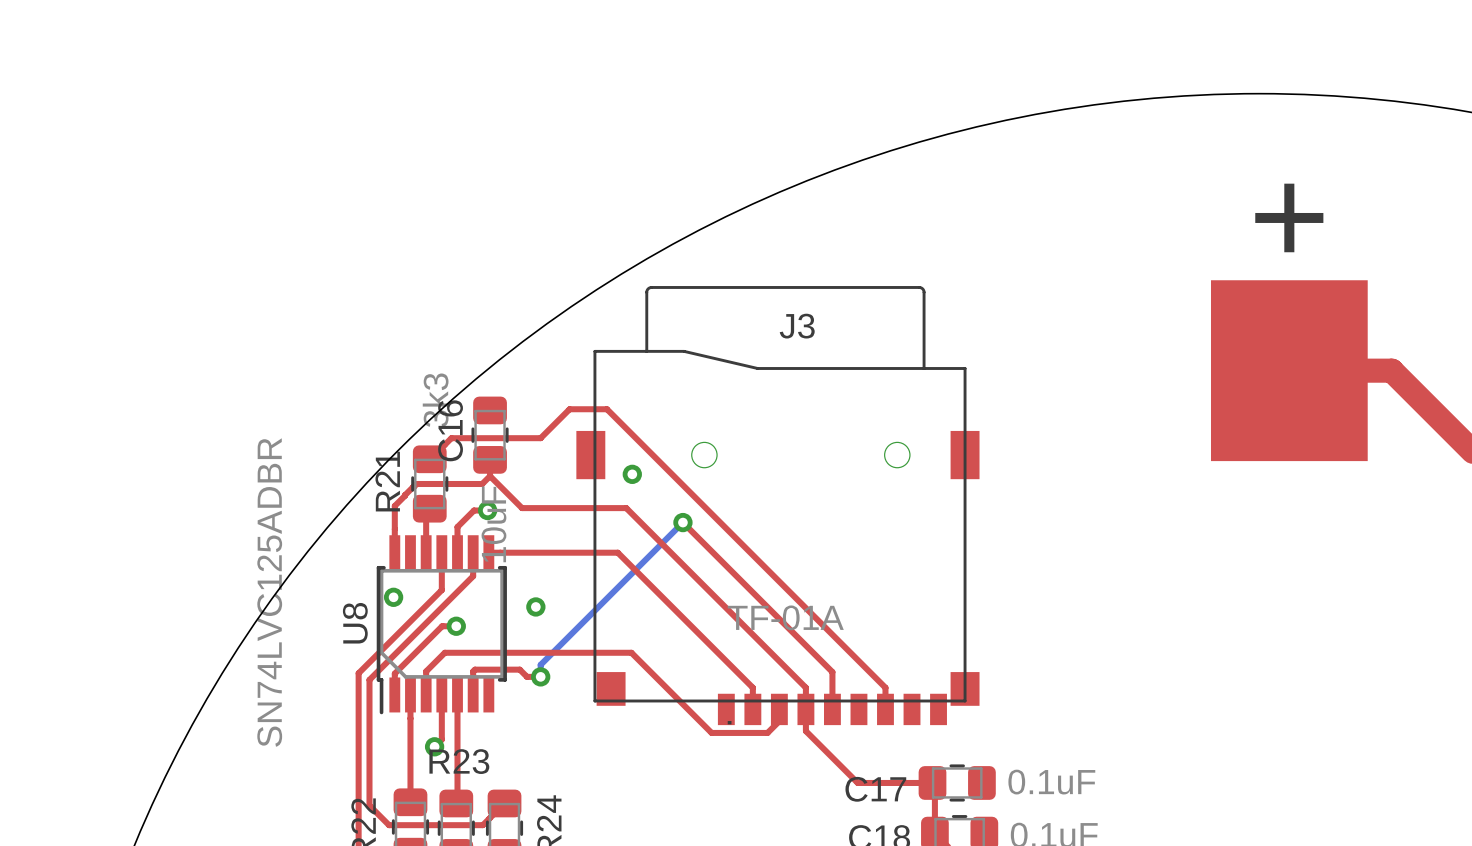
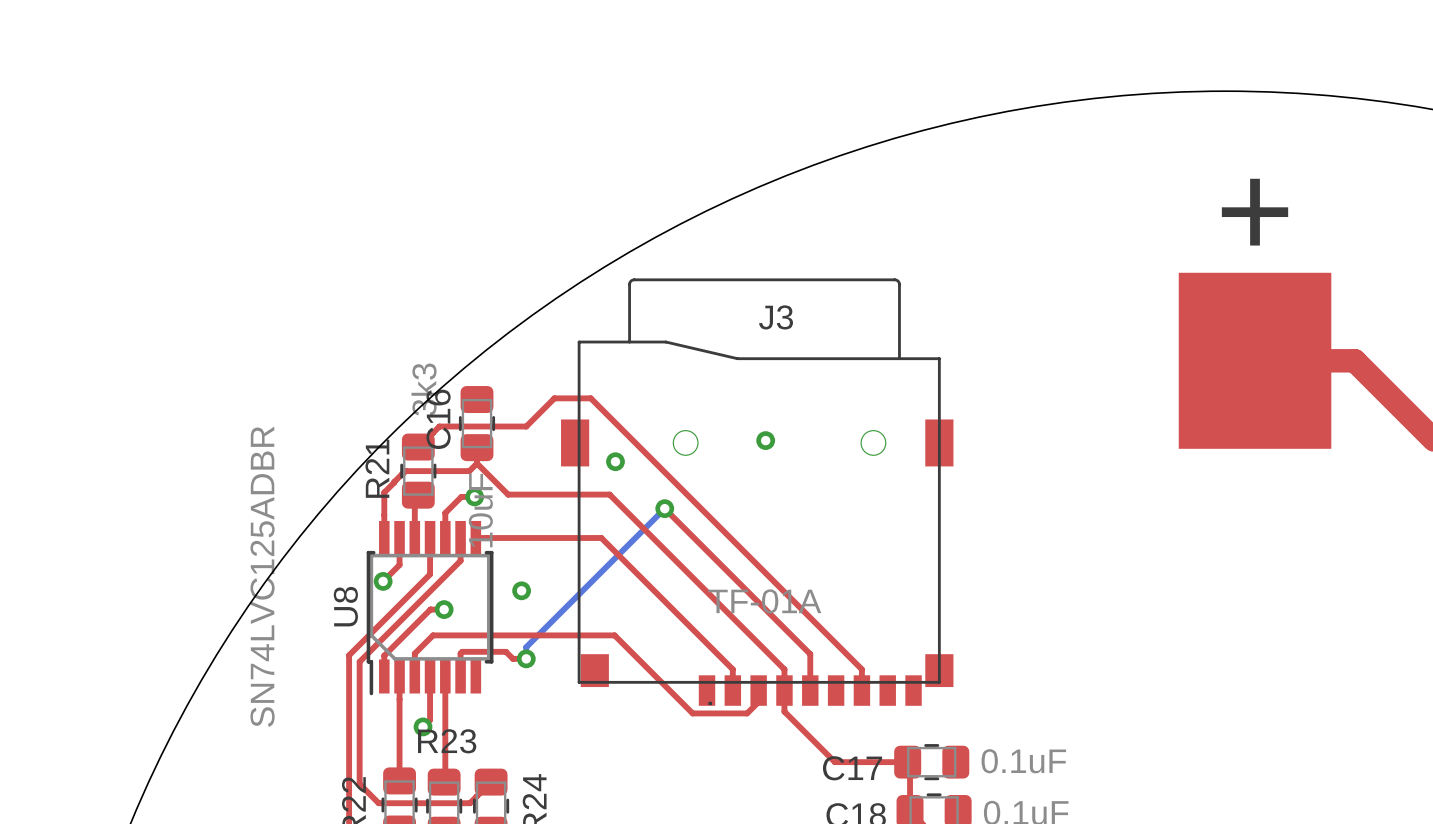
via: none -> (765, 440)
top track: none -> (399, 538) (399, 564) (383, 581)

